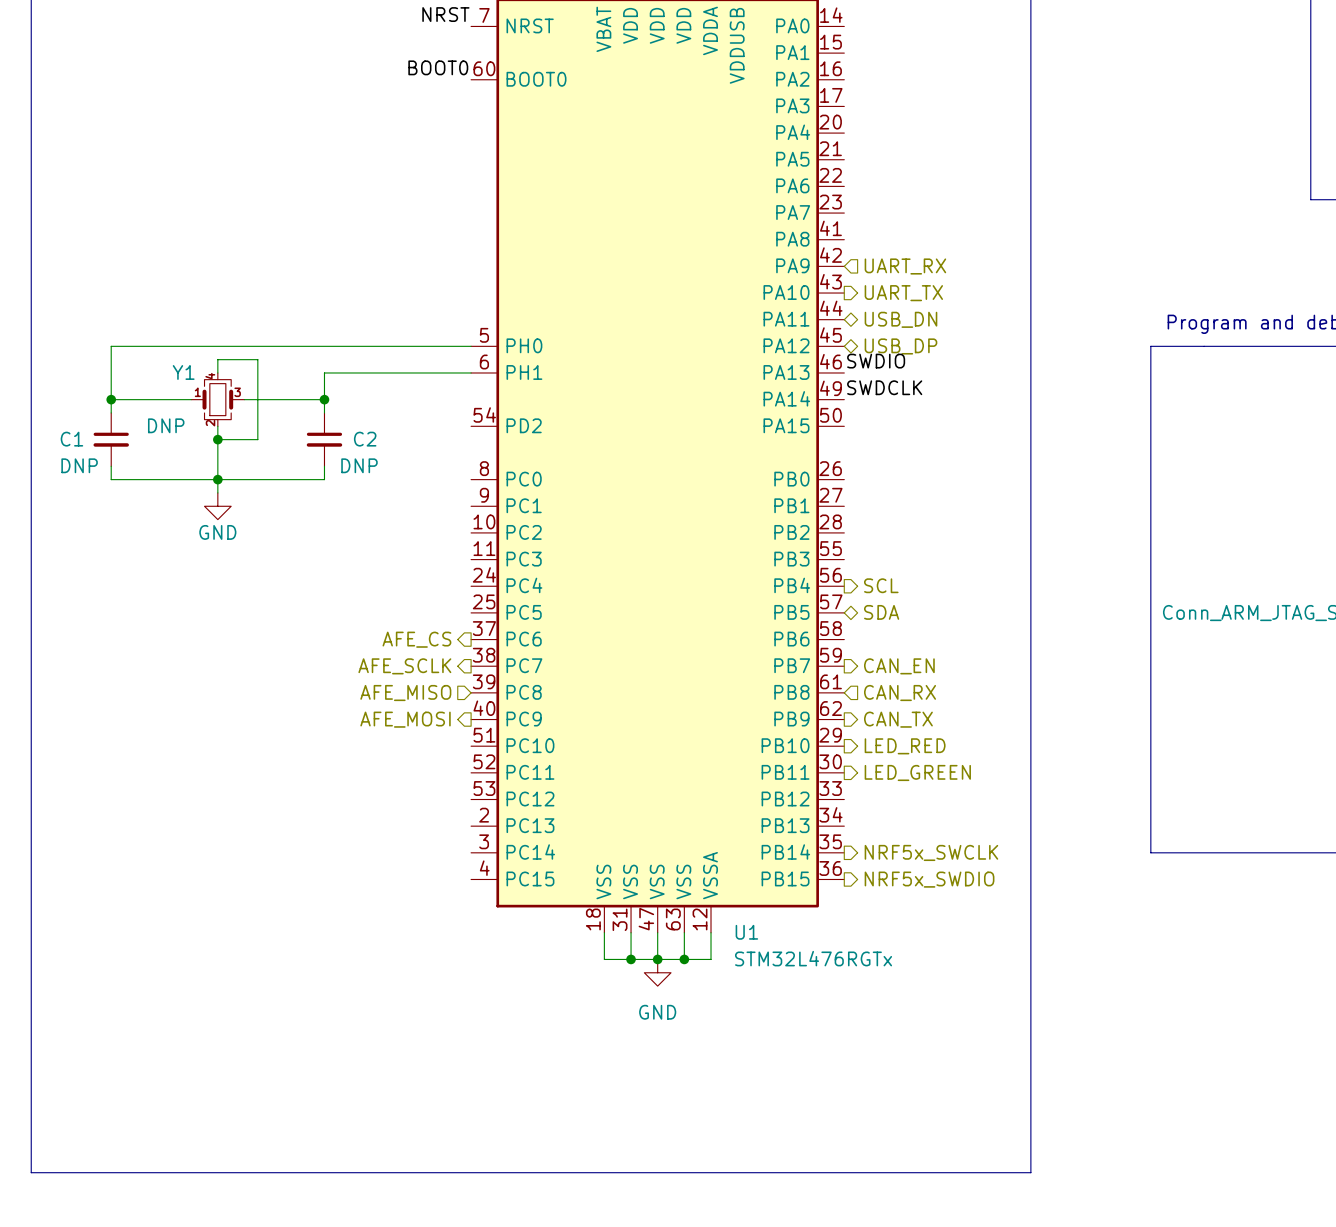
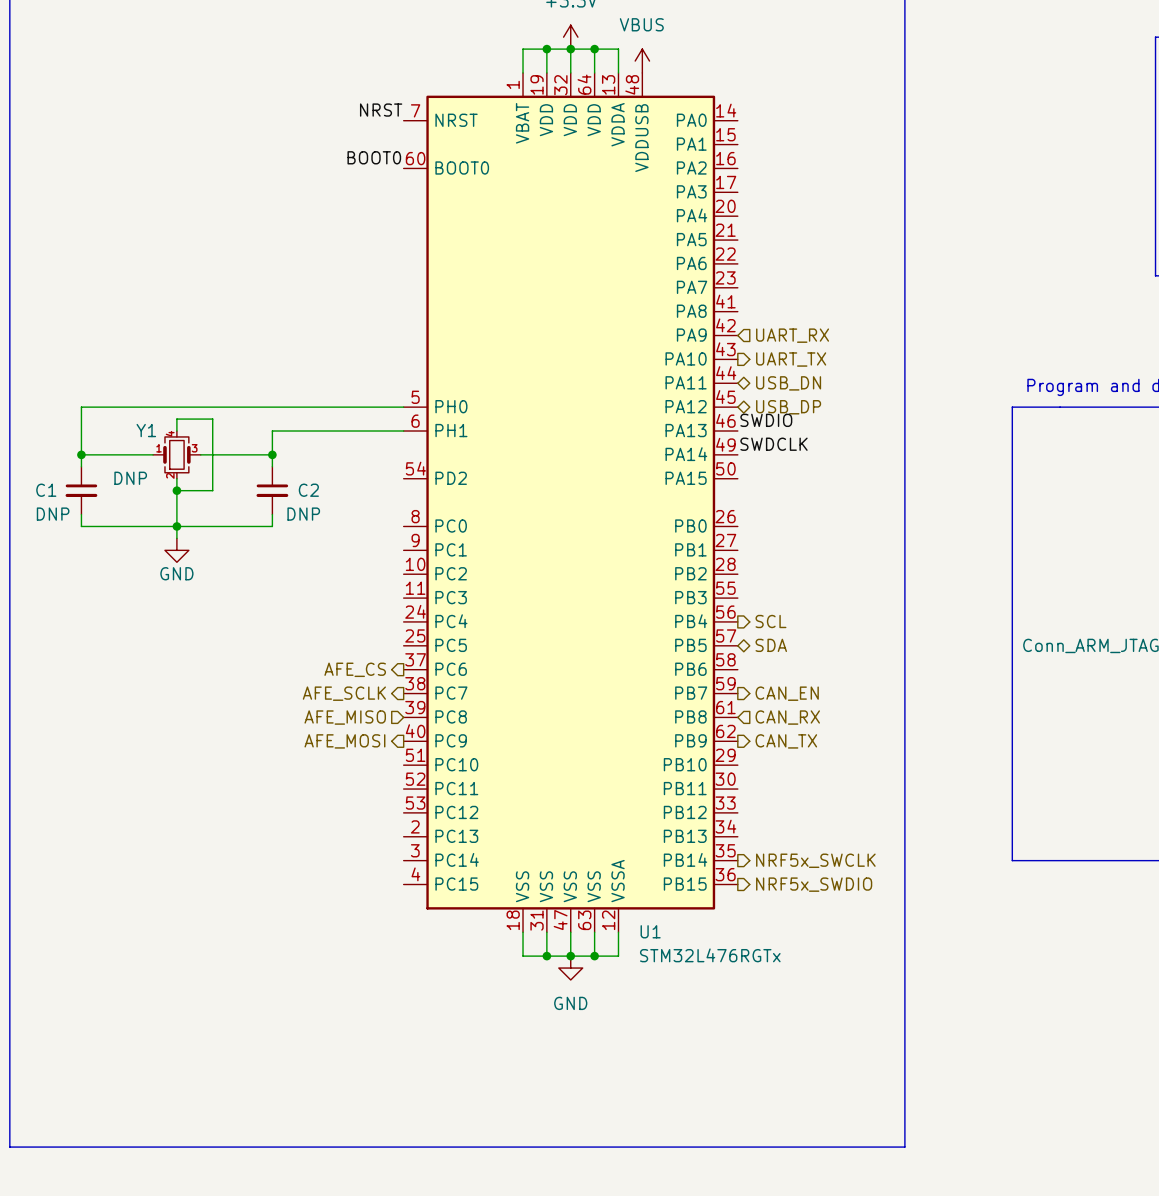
hierarchical label: LED_RED (905, 746) -> none
hierarchical label: LED_GREEN (917, 772) -> none

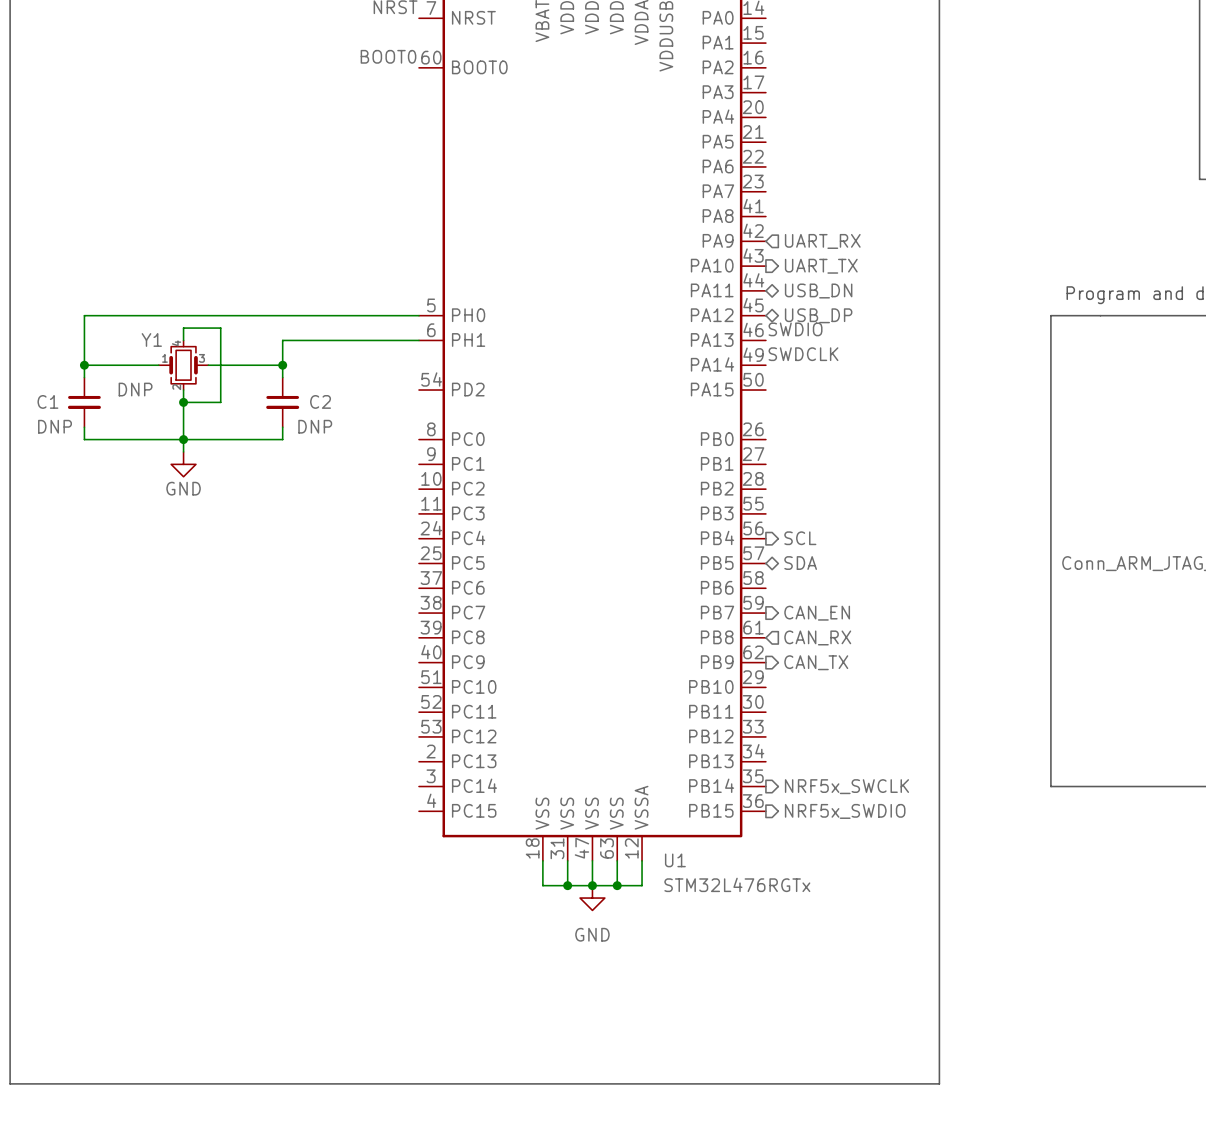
hierarchical label: AFE_CS (355, 669) -> none
hierarchical label: AFE_SCLK (344, 693) -> none
hierarchical label: AFE_MISO (345, 717) -> none
hierarchical label: AFE_MOSI (344, 741) -> none

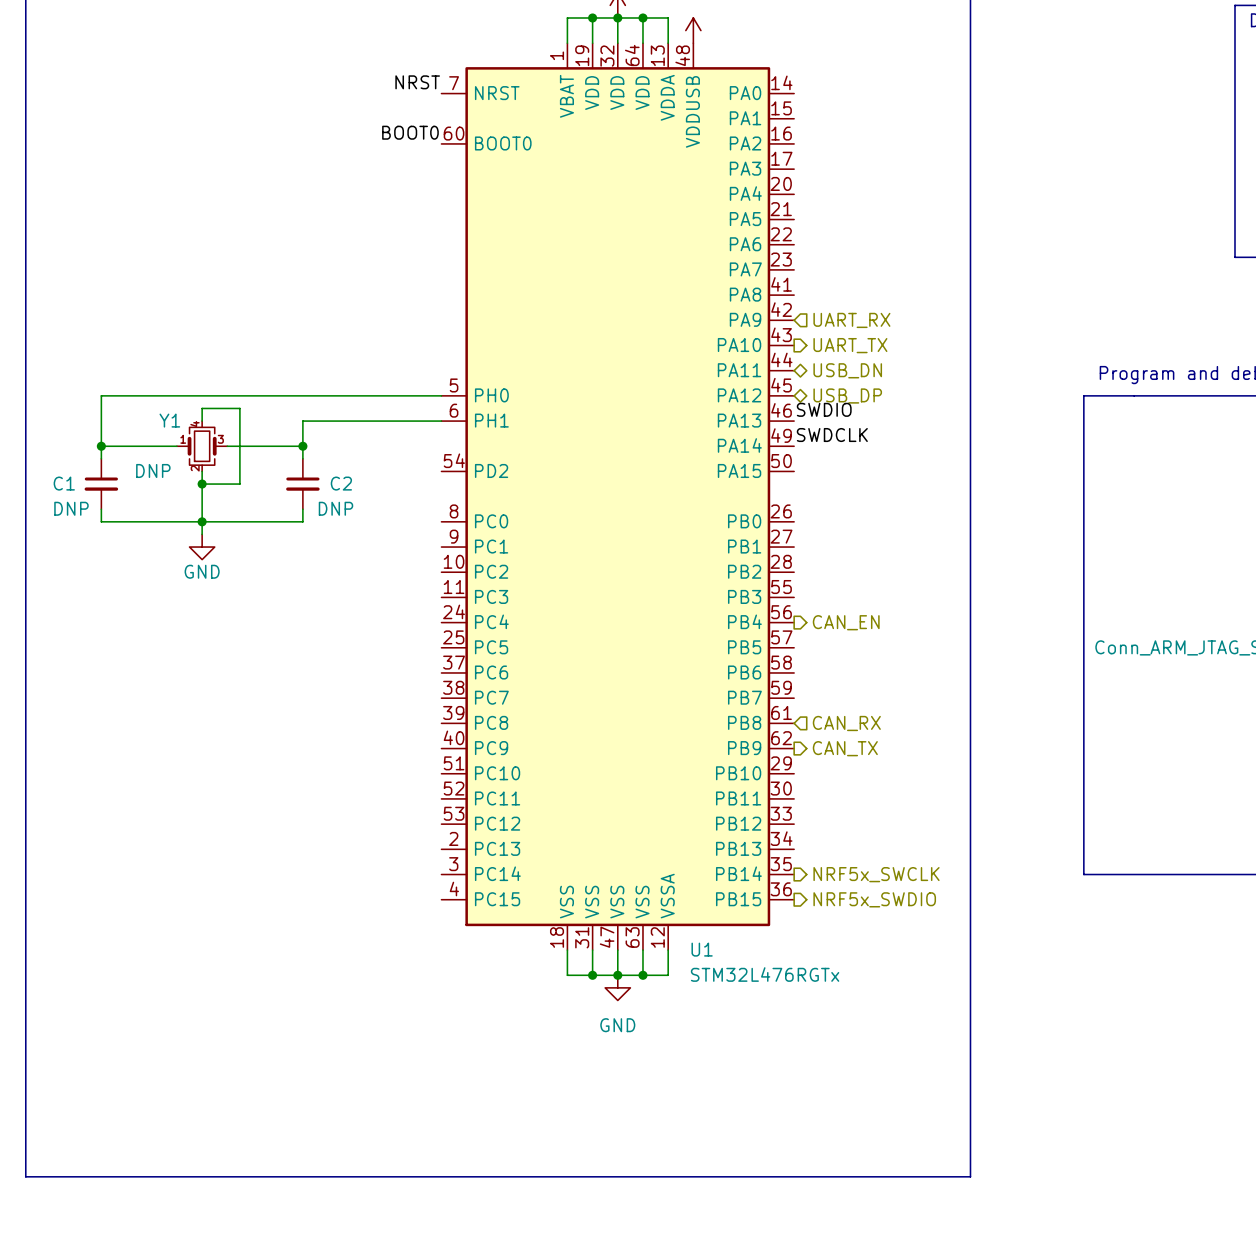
hierarchical label: SCL (800, 538) -> CAN_EN (846, 622)
hierarchical label: SDA (800, 563) -> none
hierarchical label: CAN_EN (817, 613) -> none

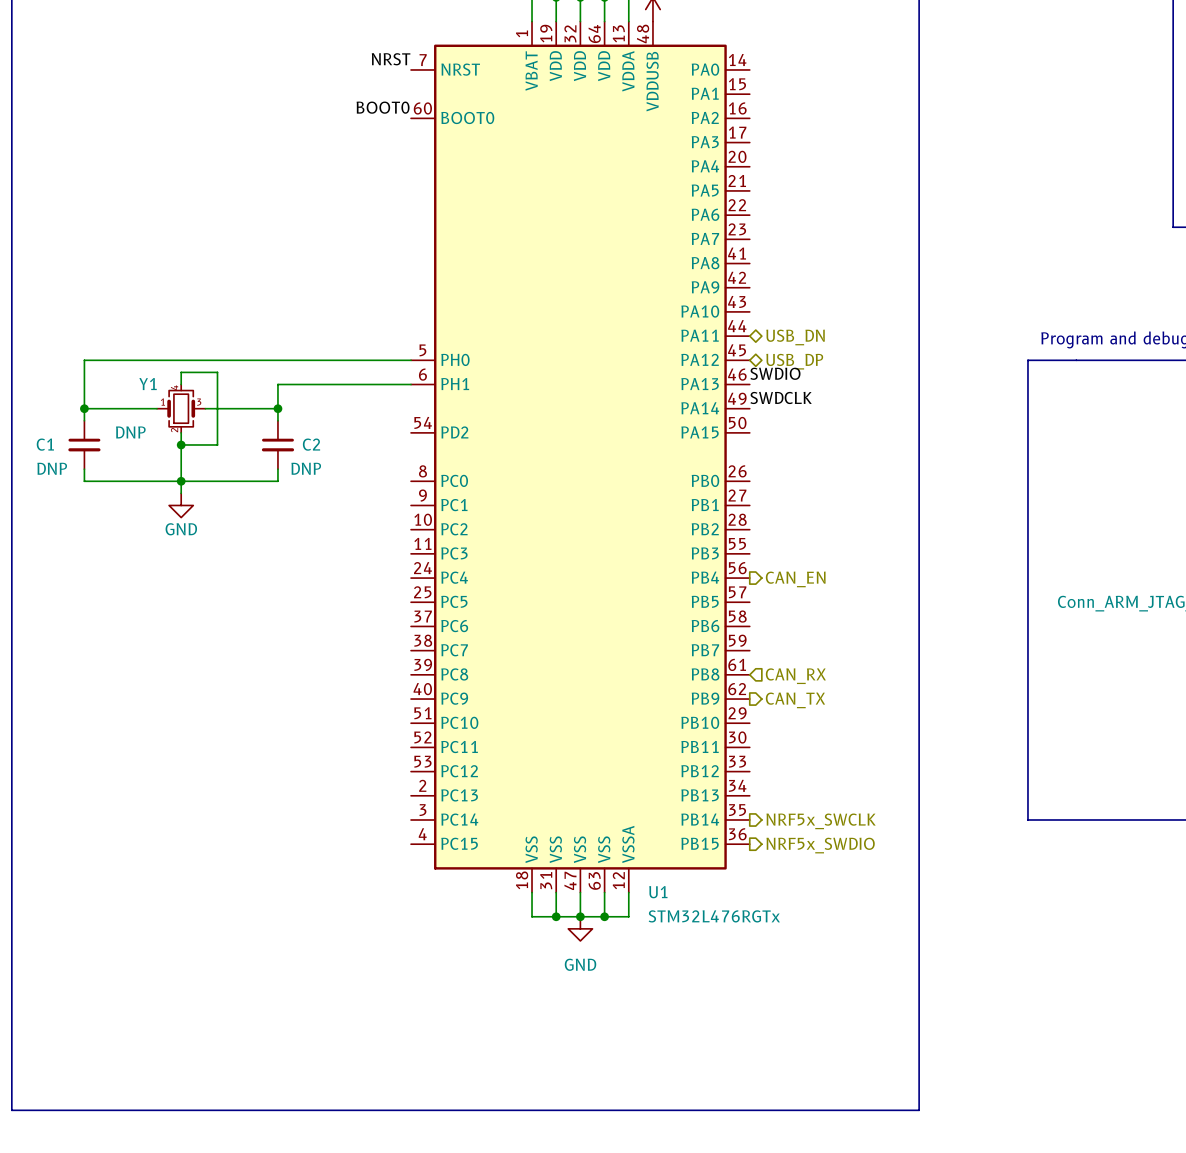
hierarchical label: UART_RX (851, 320) -> none
hierarchical label: UART_TX (850, 345) -> none

